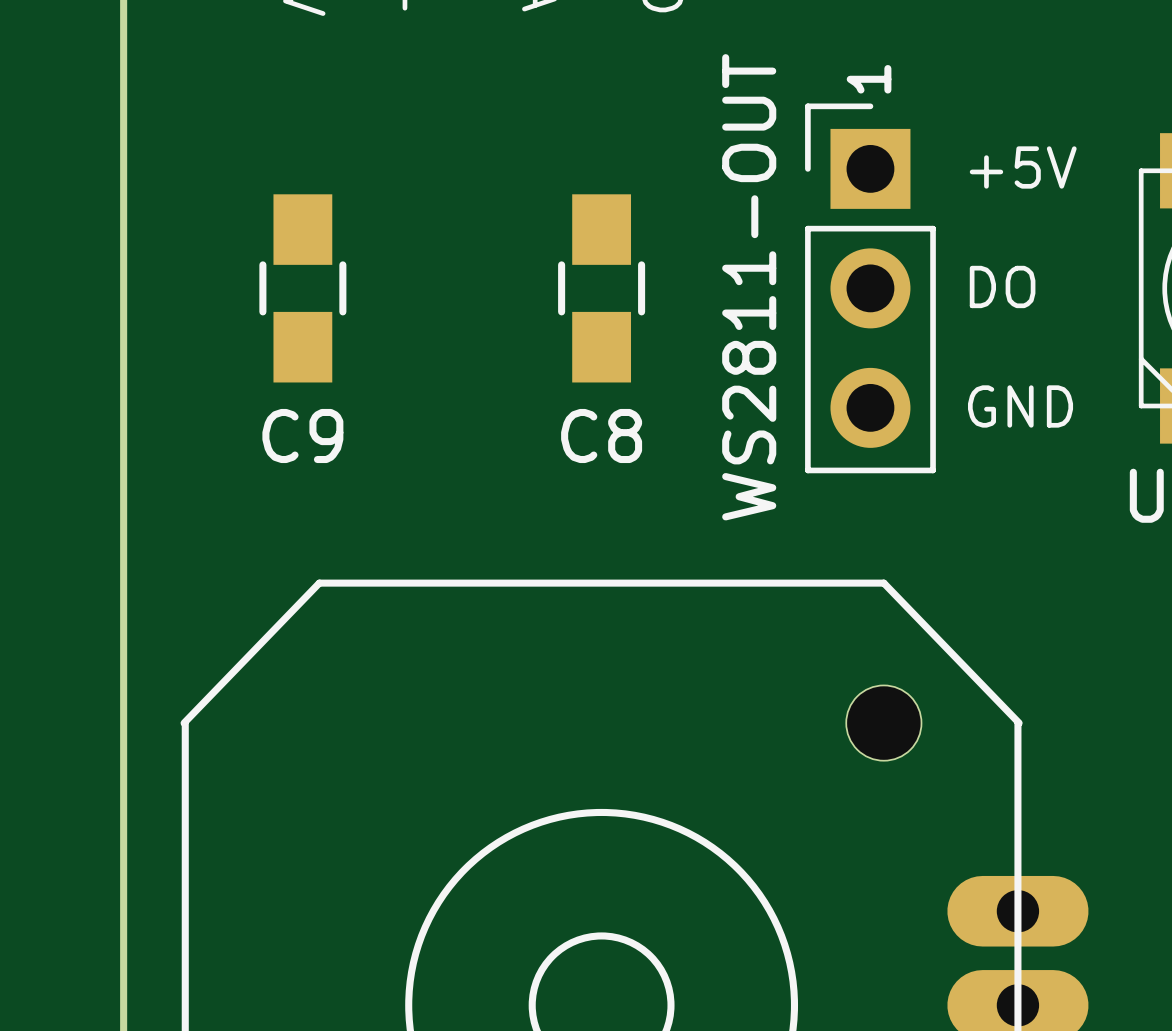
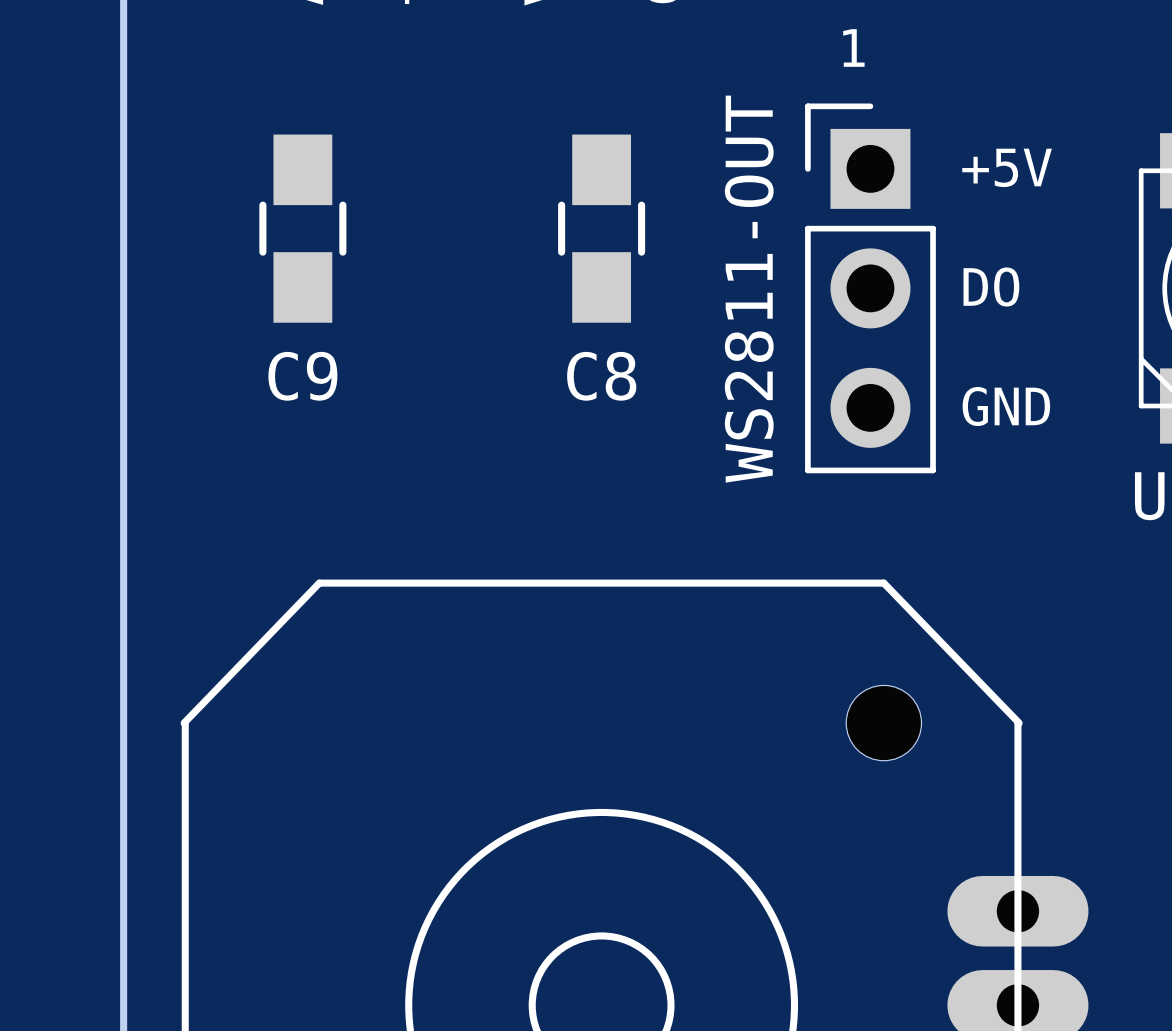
text rotation: 0° (869, 79) -> 90° clockwise (853, 48)
C9 position: (302, 288) -> (302, 228)
C8 position: (601, 288) -> (601, 228)

